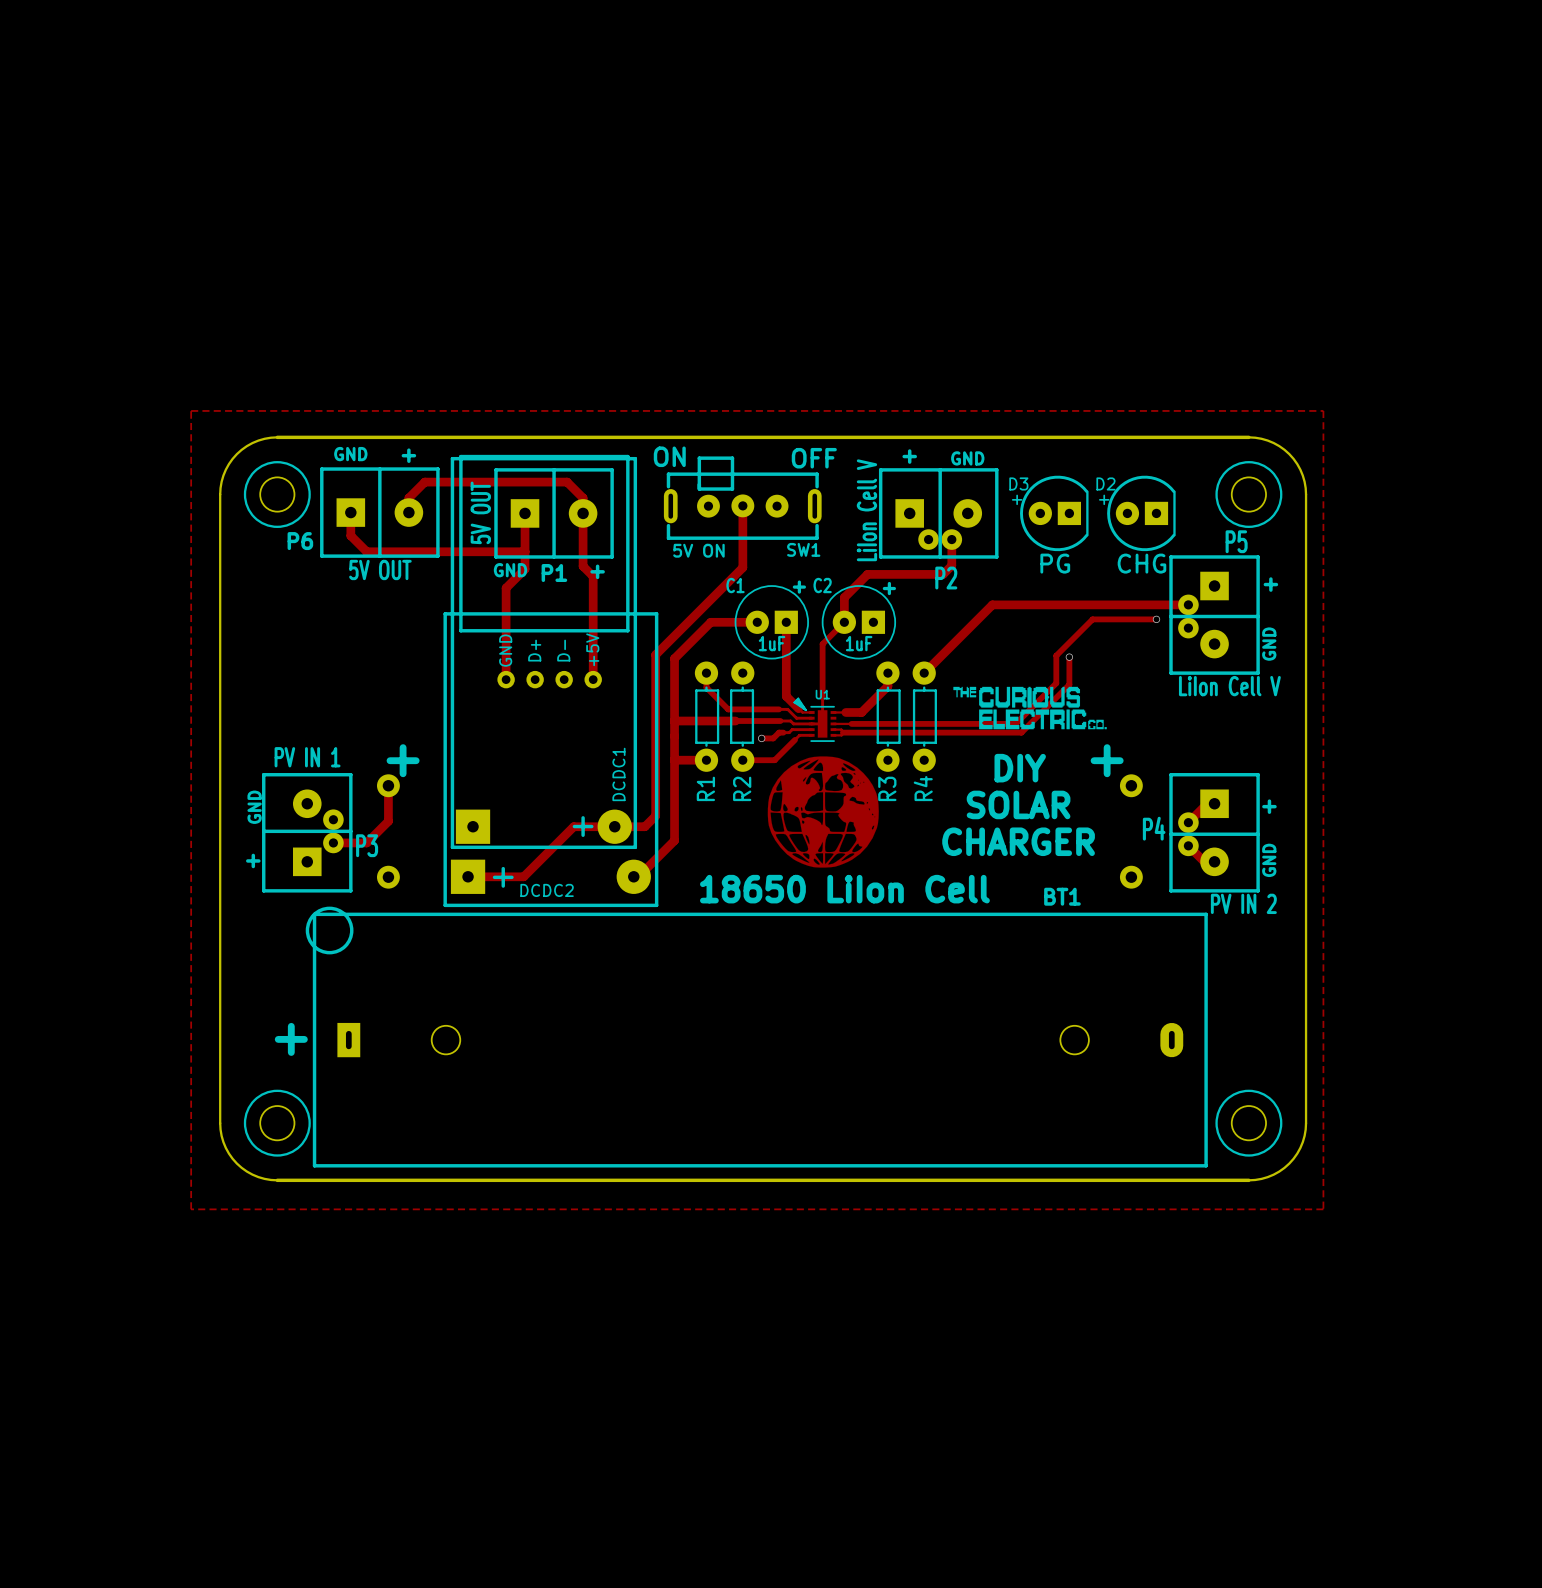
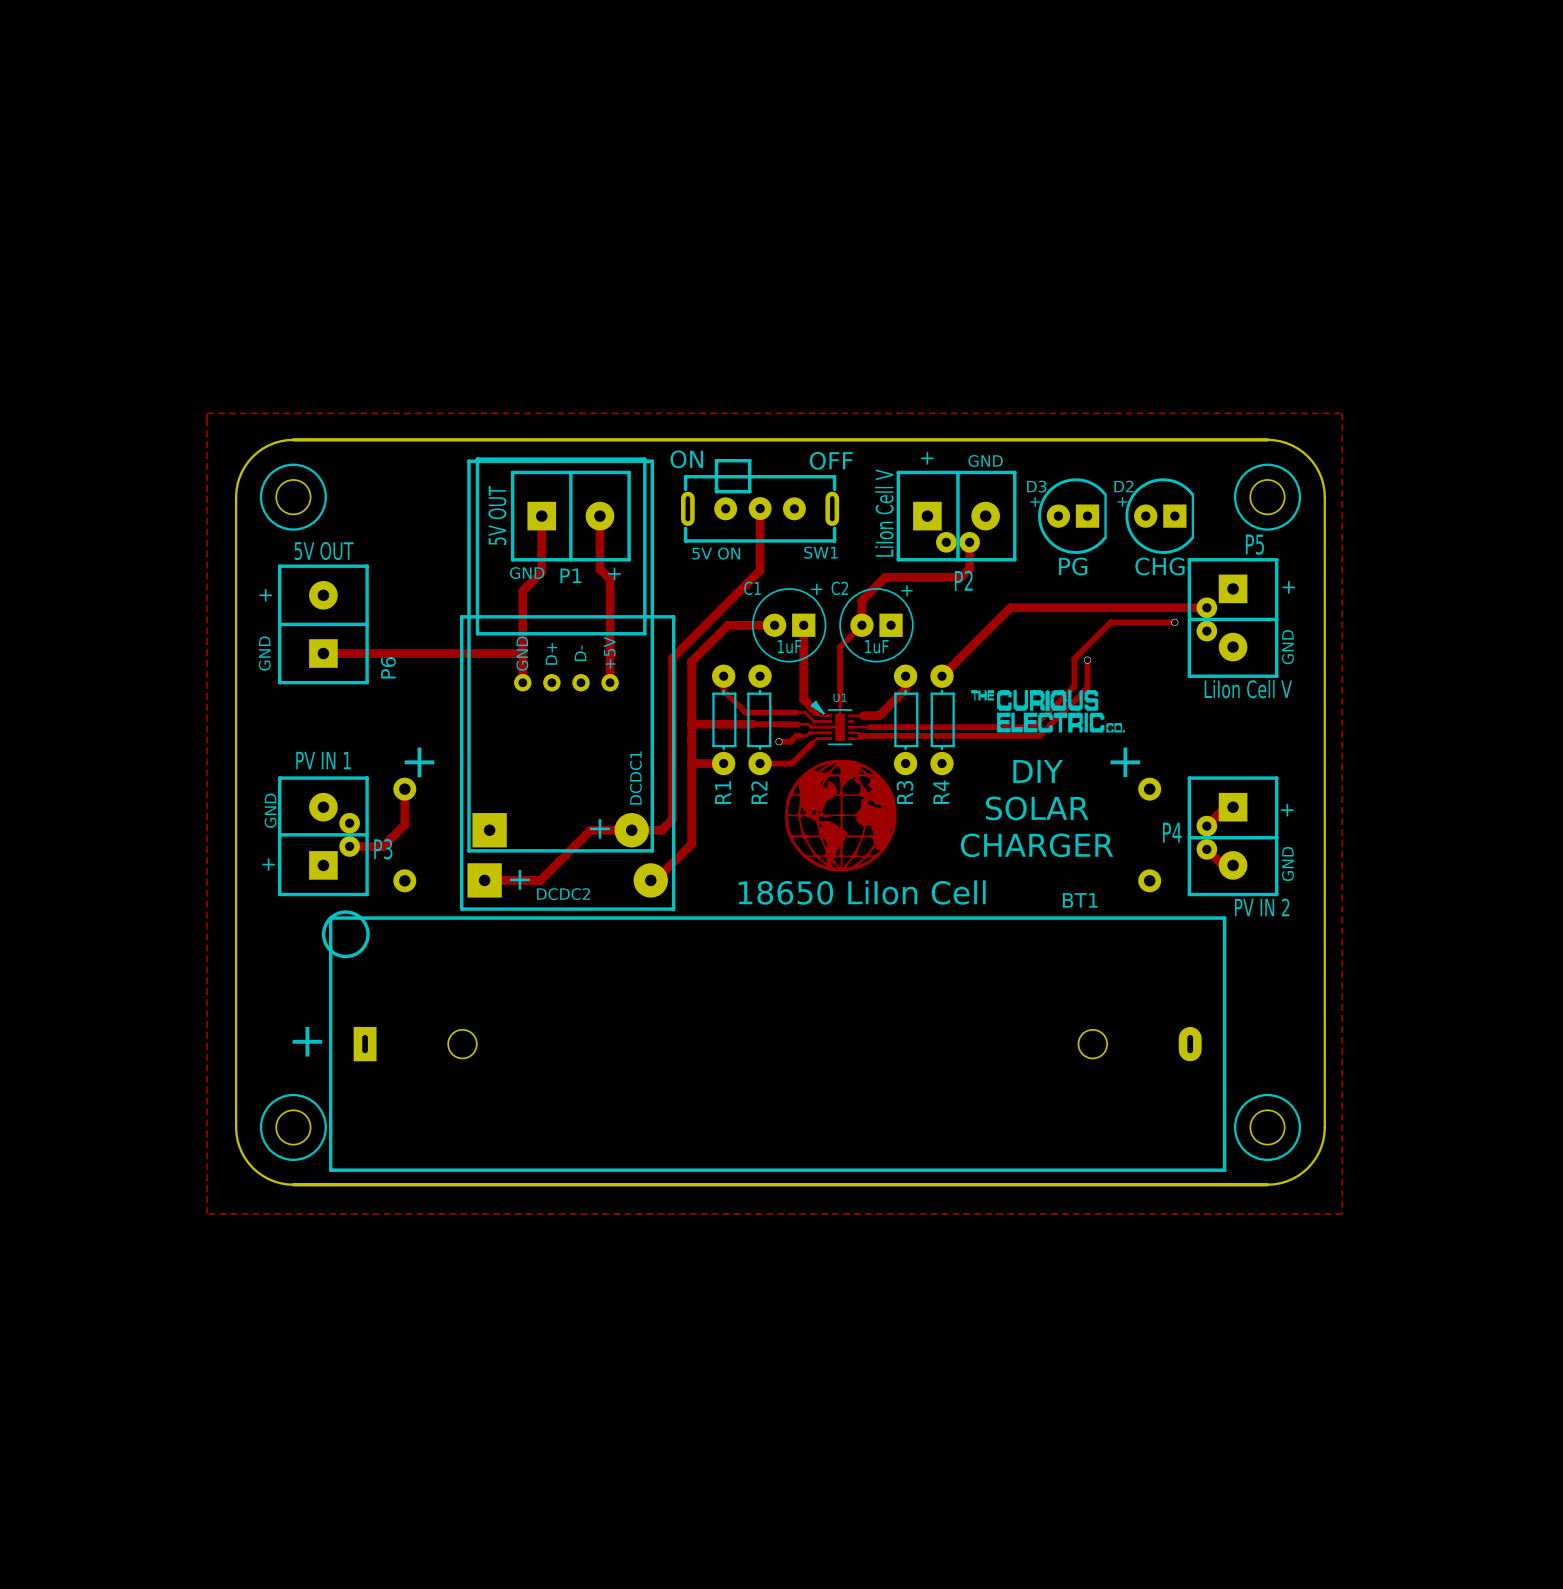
track: (350, 512) (350, 535) (366, 551) (525, 551) -> none
P6 rotation: 0° (379, 512) -> 90° counterclockwise (323, 624)
P6 position: (379, 512) -> (323, 624)
track: (408, 512) (408, 498) (424, 482) (567, 482) (583, 498) (583, 513) -> none
P6 name position: P6 (300, 541) -> P6 (388, 667)
P6 value position: 5V OUT (380, 569) -> 5V OUT (324, 550)
track: none -> (323, 653) (522, 653)

